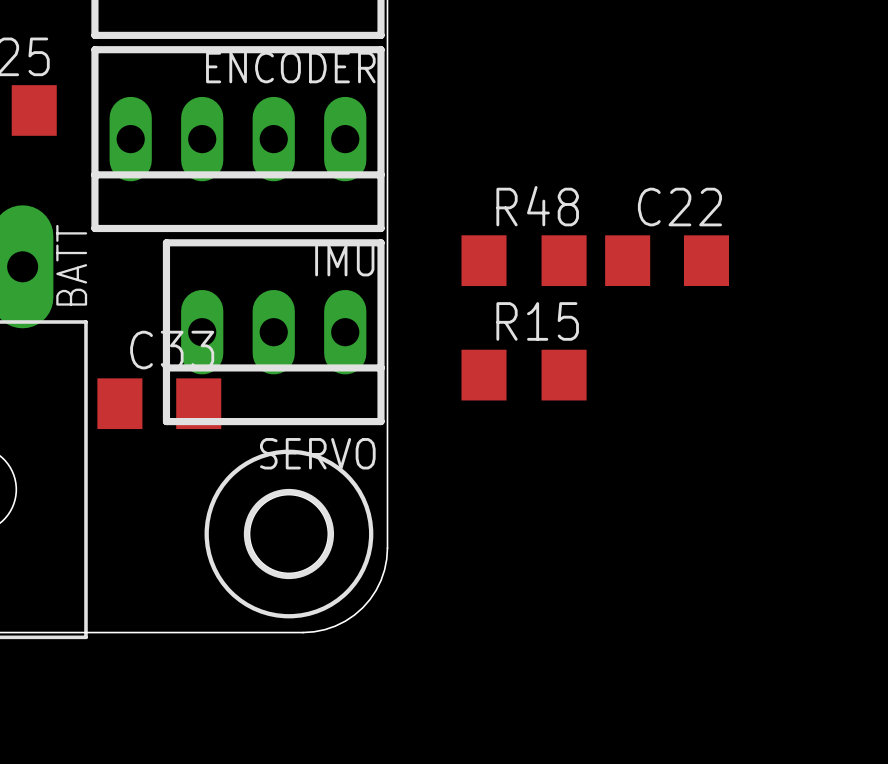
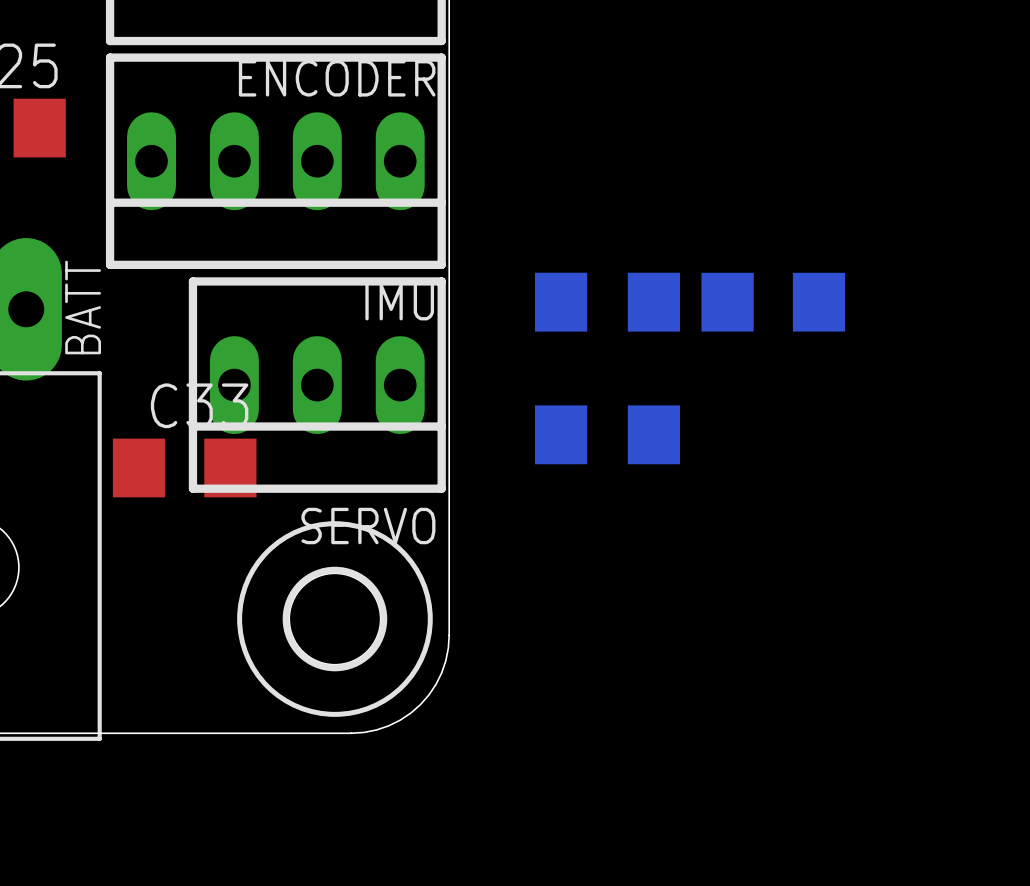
R48 side: top (524, 260) -> bottom (607, 302)
C22 side: top (667, 260) -> bottom (773, 302)
R15 side: top (524, 375) -> bottom (607, 434)

